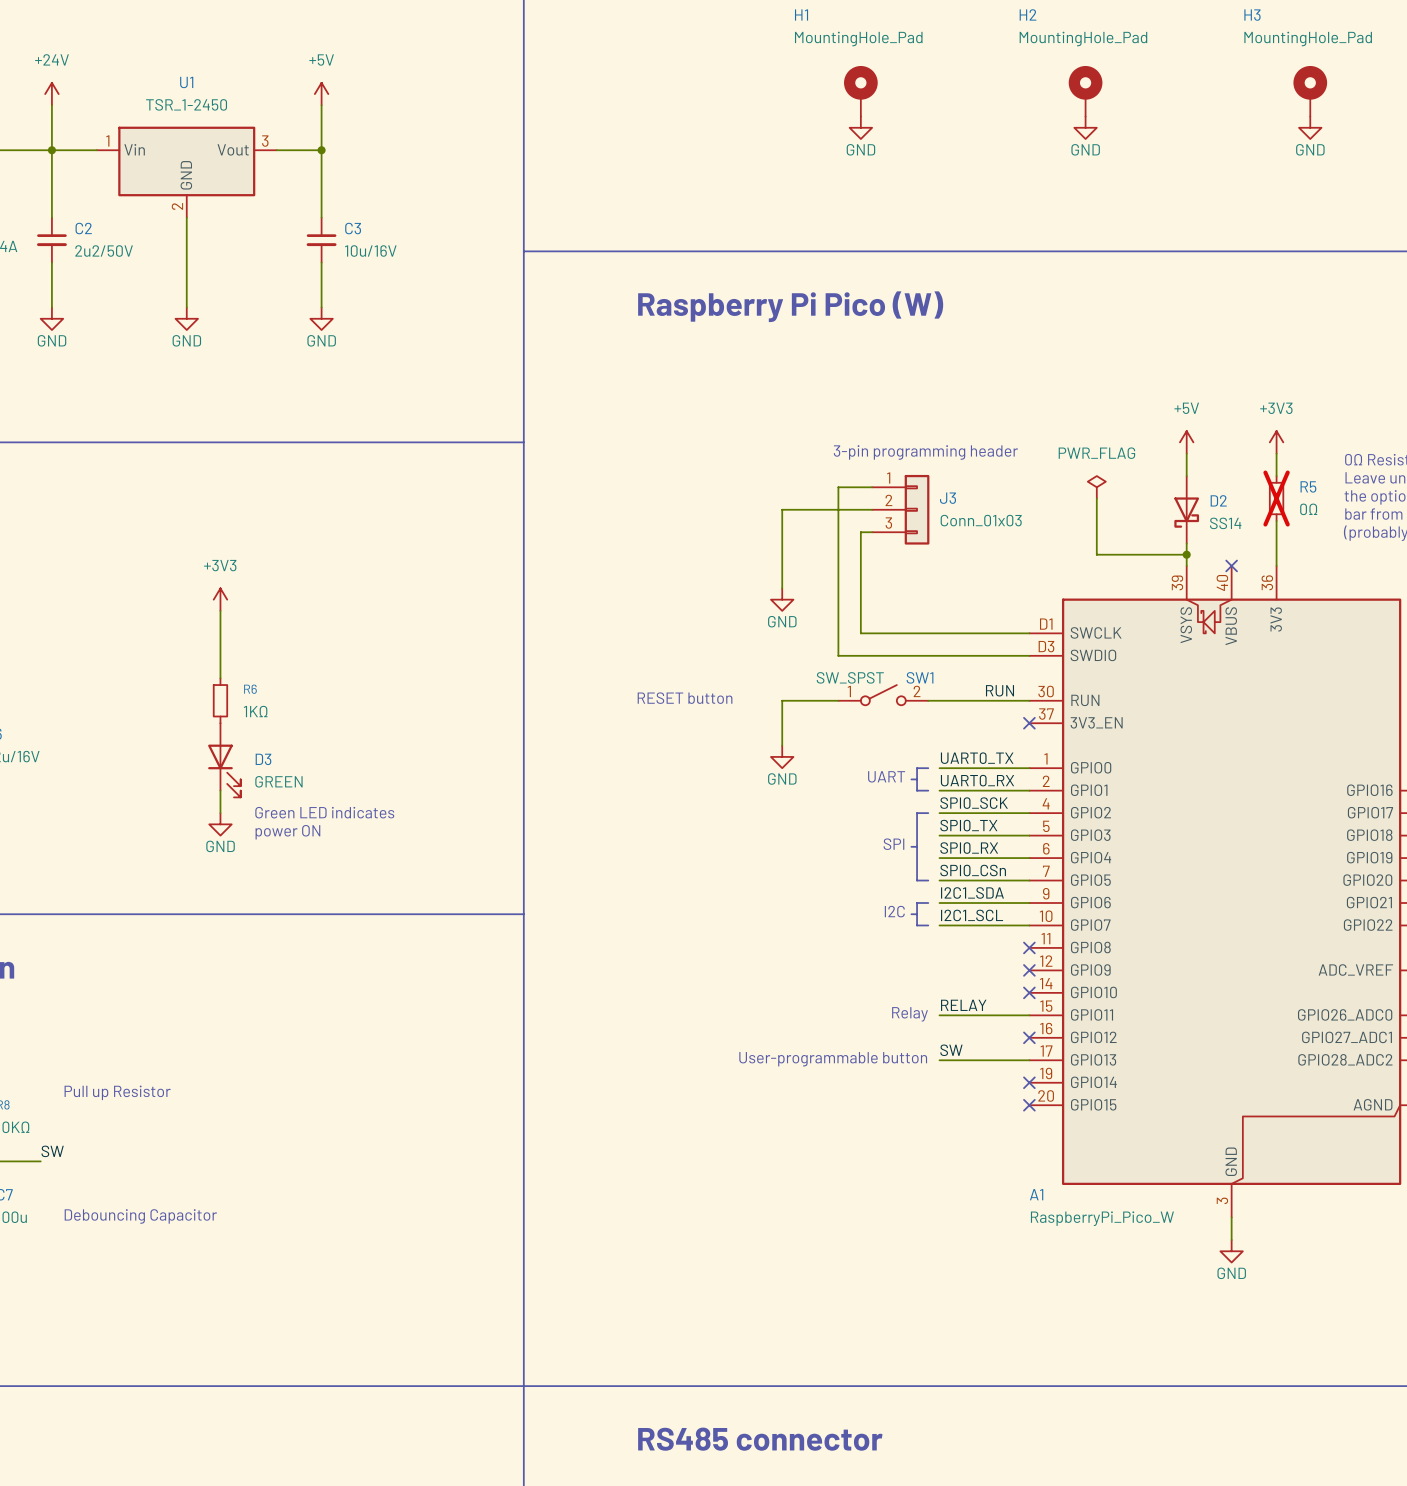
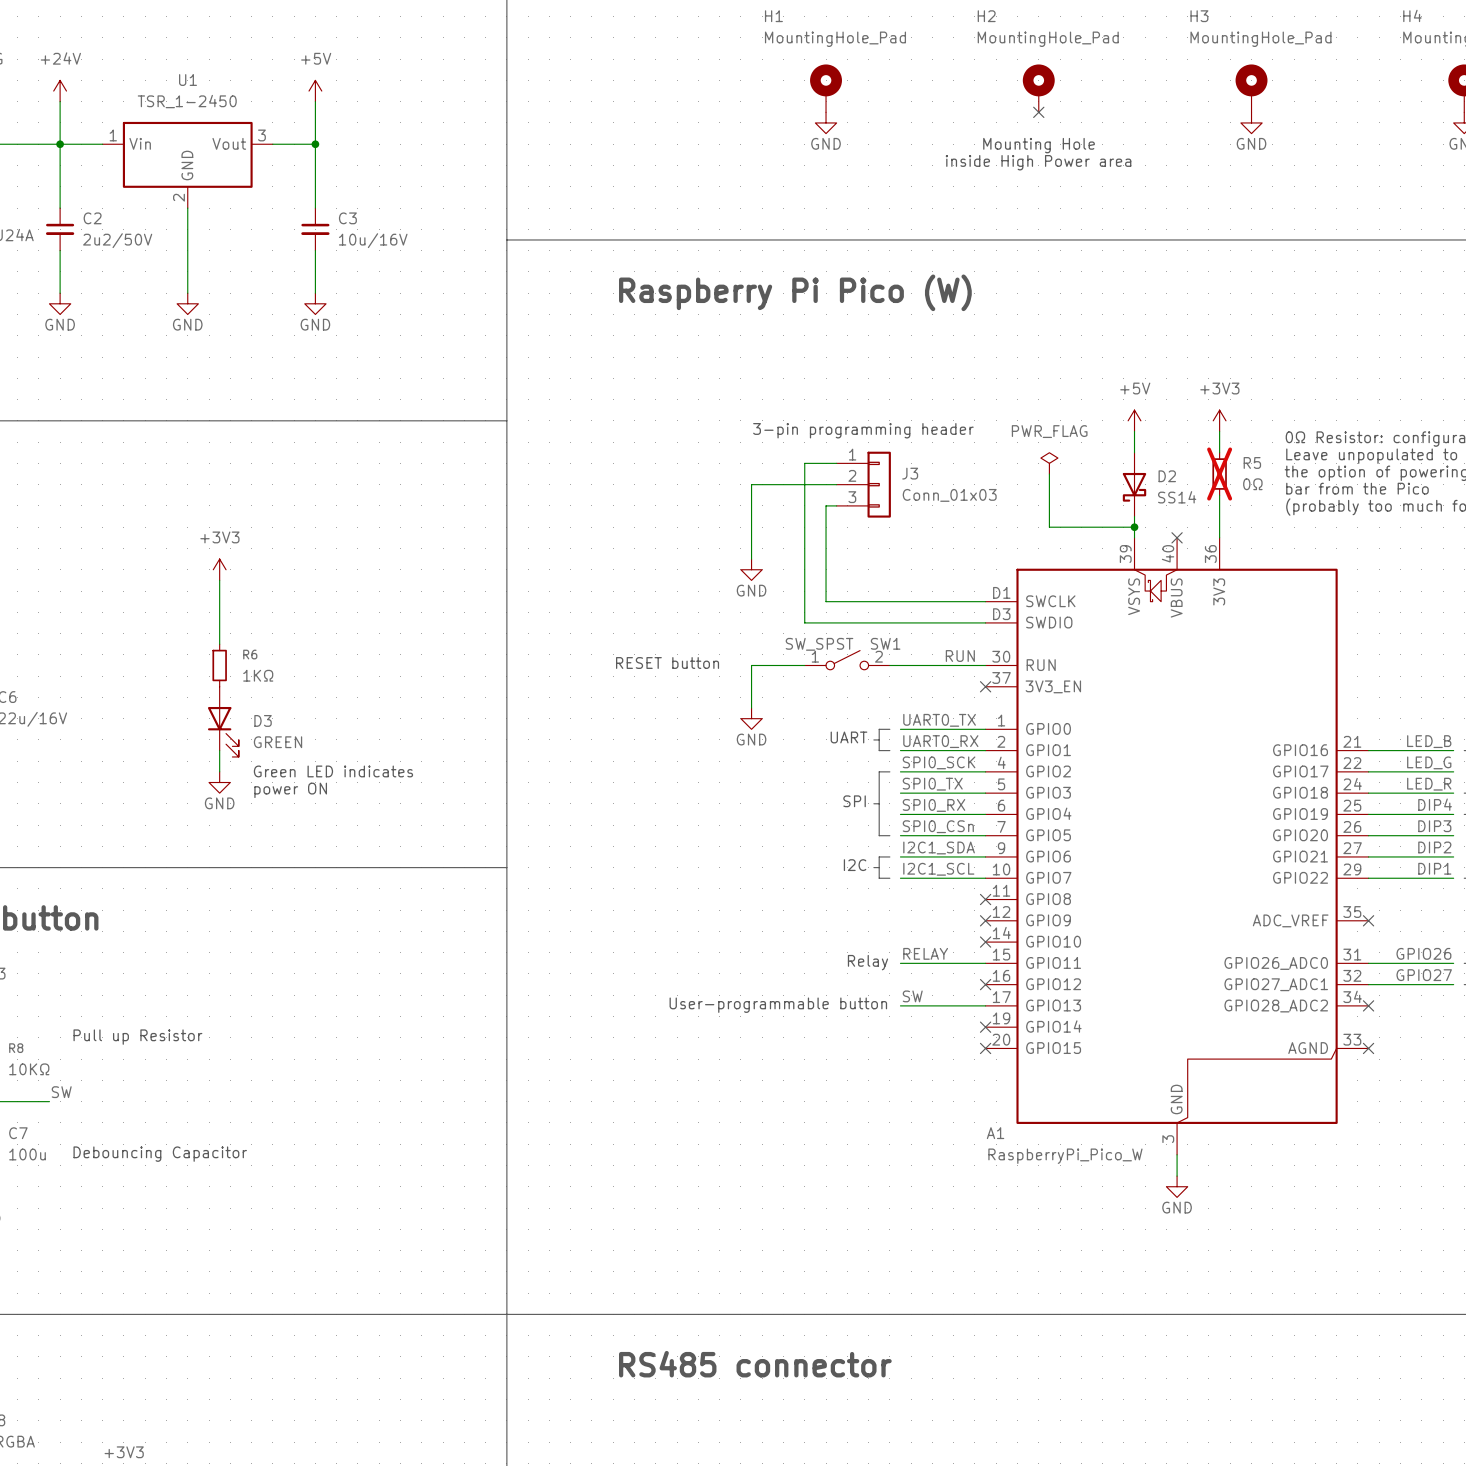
no-connect mark: none -> (1038, 112)
power symbol: GND (1085, 127) -> none
text: none -> Mounting Hole (1039, 145)
text: none -> inside High Power area (1038, 162)

